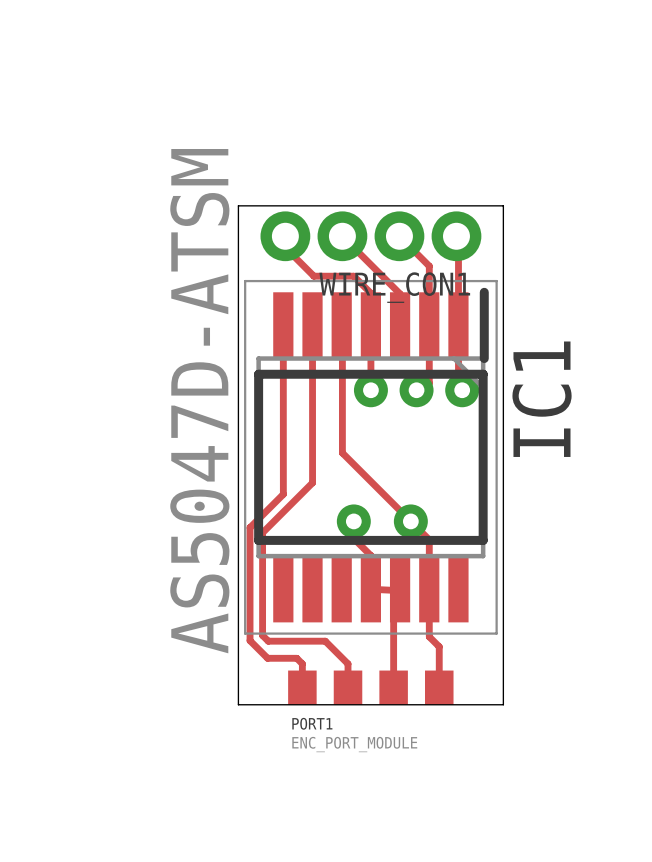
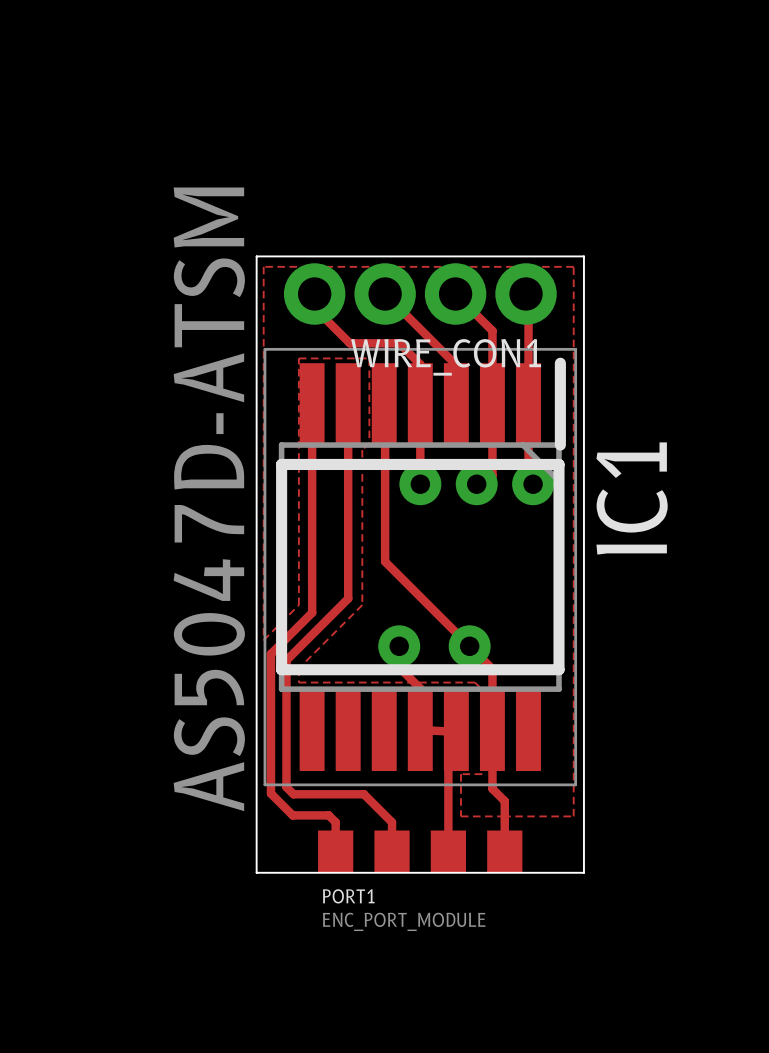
zone outline: none -> (263, 266) (573, 266) (573, 816) (460, 816) (460, 774) (482, 774) (482, 689) (475, 682) (298, 682) (298, 668) (362, 605) (362, 450) (369, 442) (369, 358) (298, 358) (298, 605) (263, 640) (263, 266)

